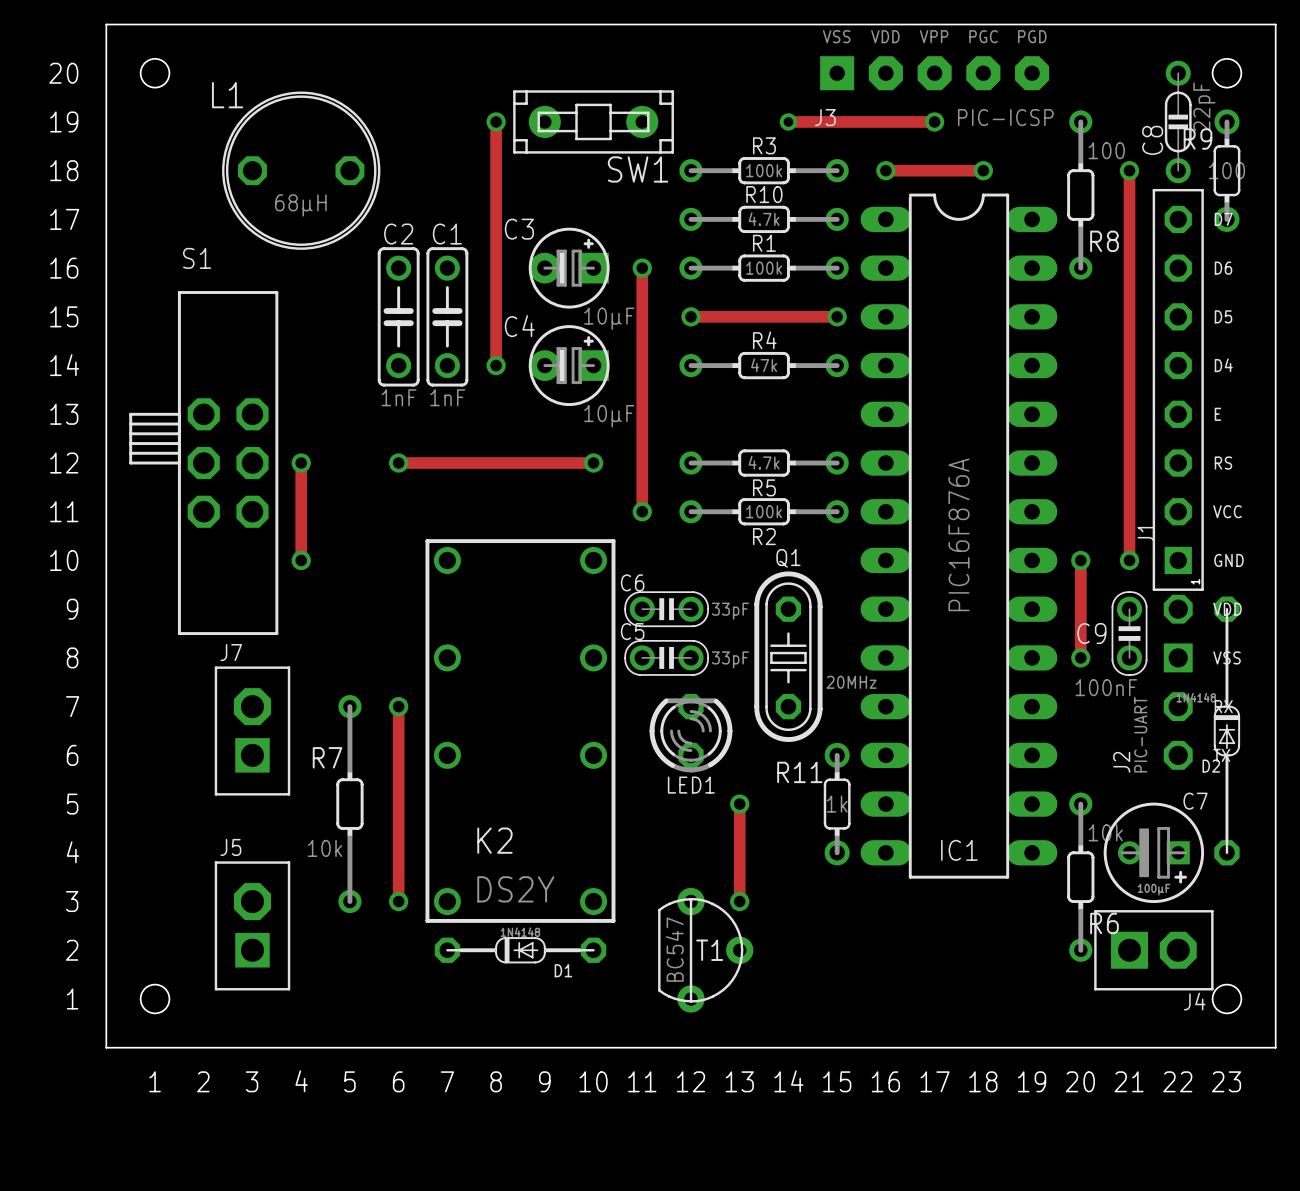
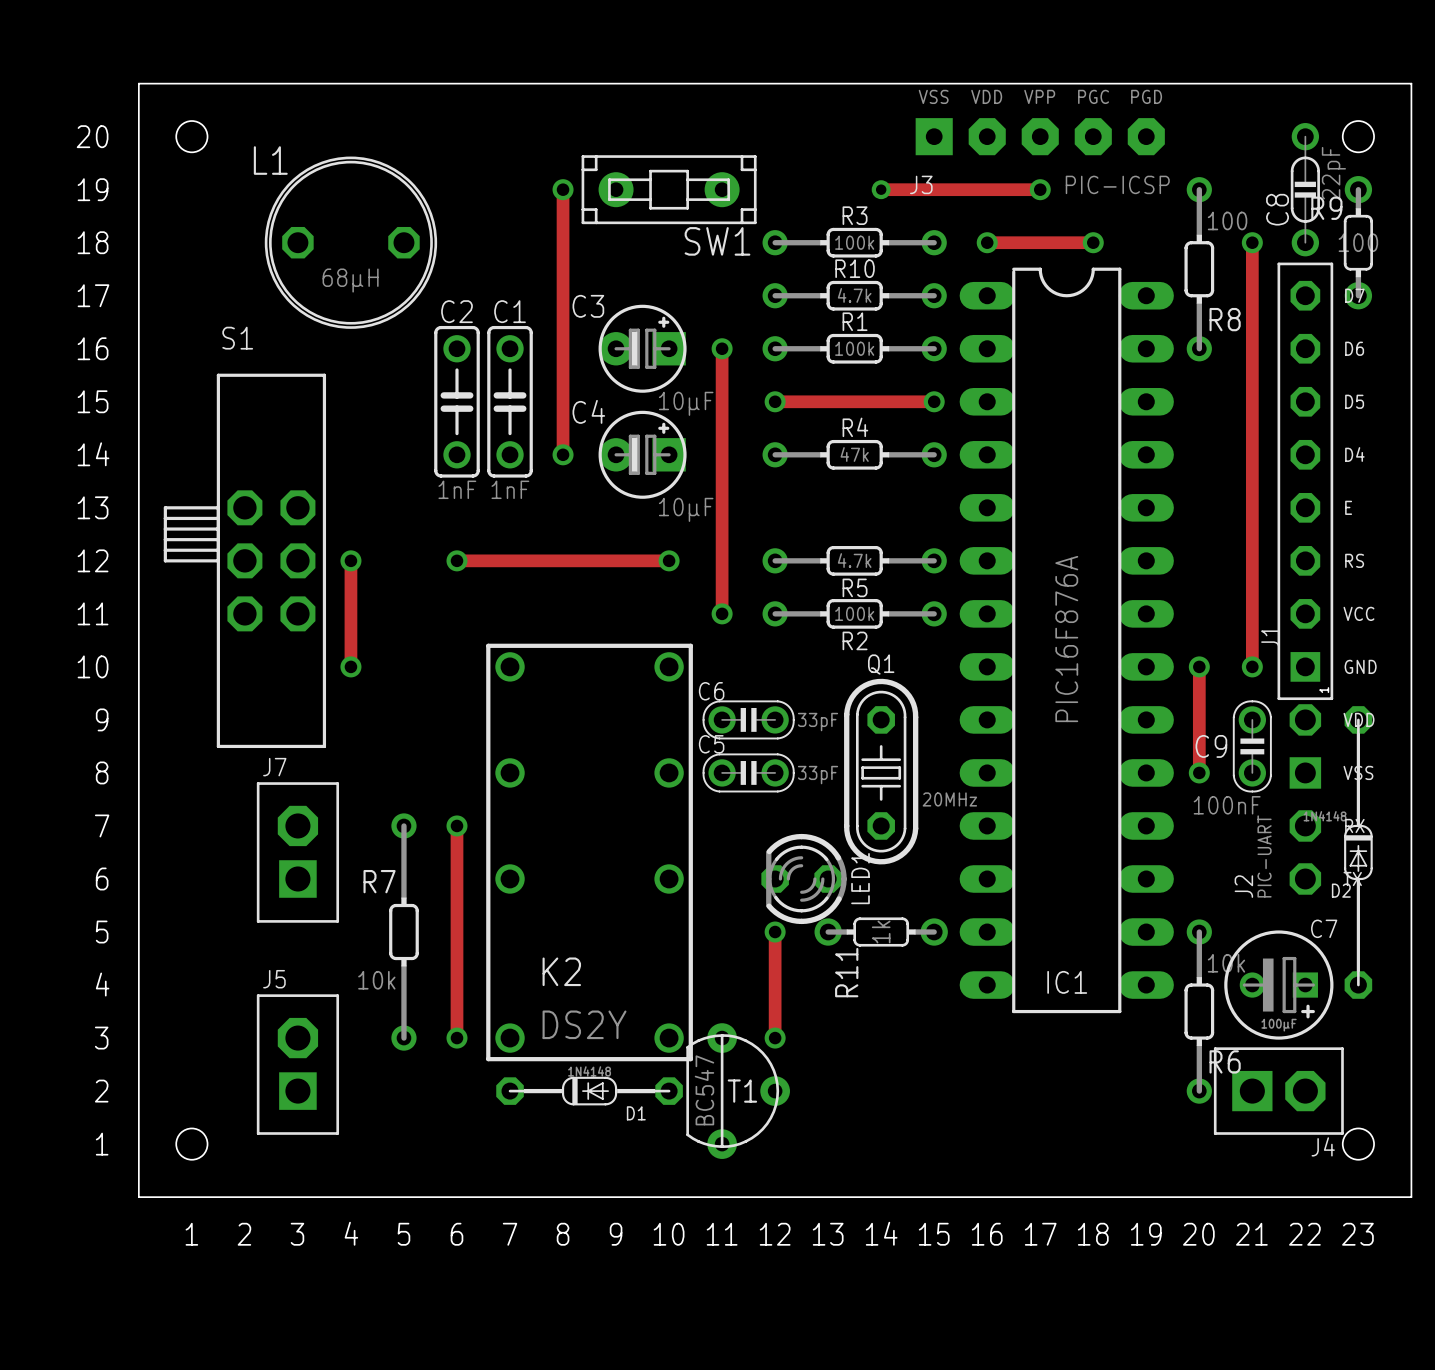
LED1 rotation: 0° (691, 733) -> 90° counterclockwise (804, 878)
R11 name position: R11 (799, 772) -> R11 (846, 972)
track: (739, 804) (739, 901) -> (775, 932) (775, 1038)
via position: (739, 804) -> (775, 932)
R11 rotation: 0° (837, 804) -> 90° clockwise (881, 932)
via position: (739, 901) -> (775, 1038)
T1 position: (705, 950) -> (738, 1091)

